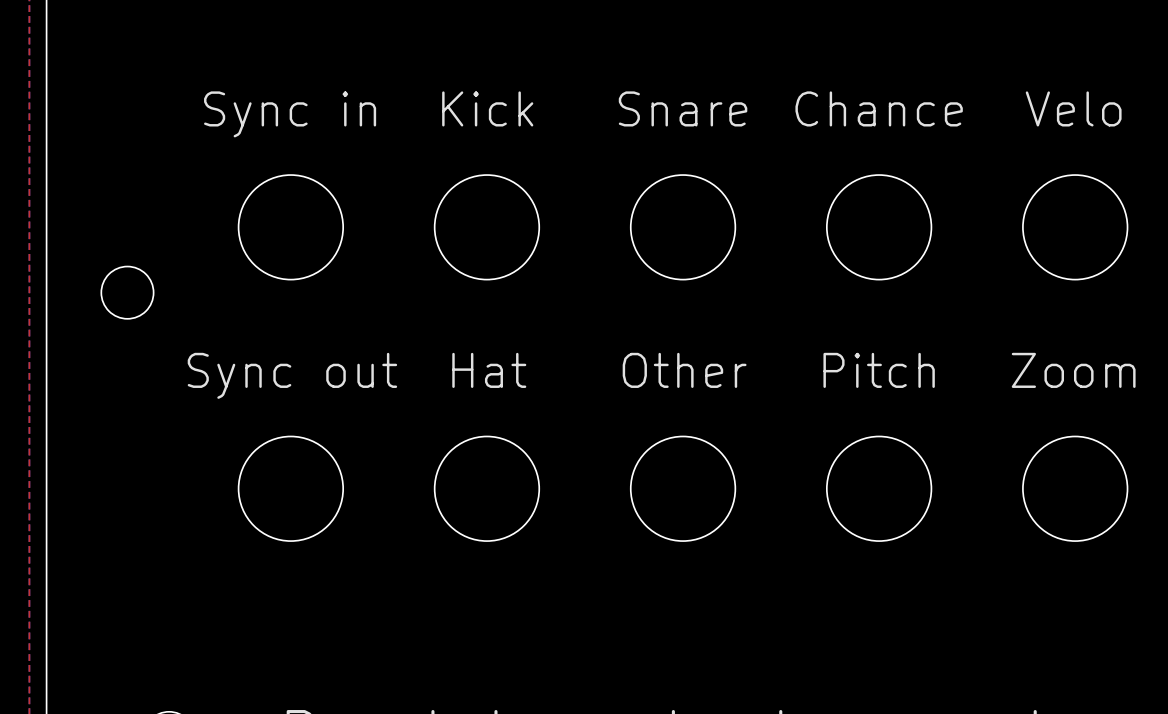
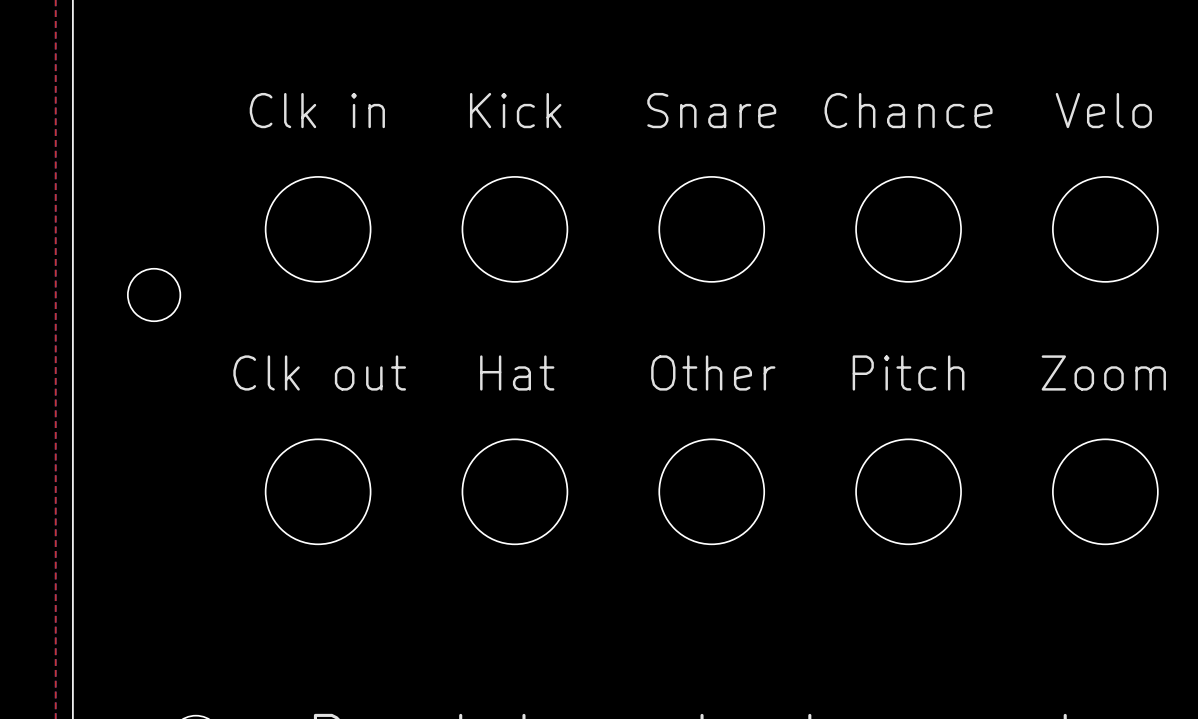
part value: Sync in (290, 114) -> Clk in (317, 110)
part value: Sync out (292, 375) -> Clk out (319, 372)

